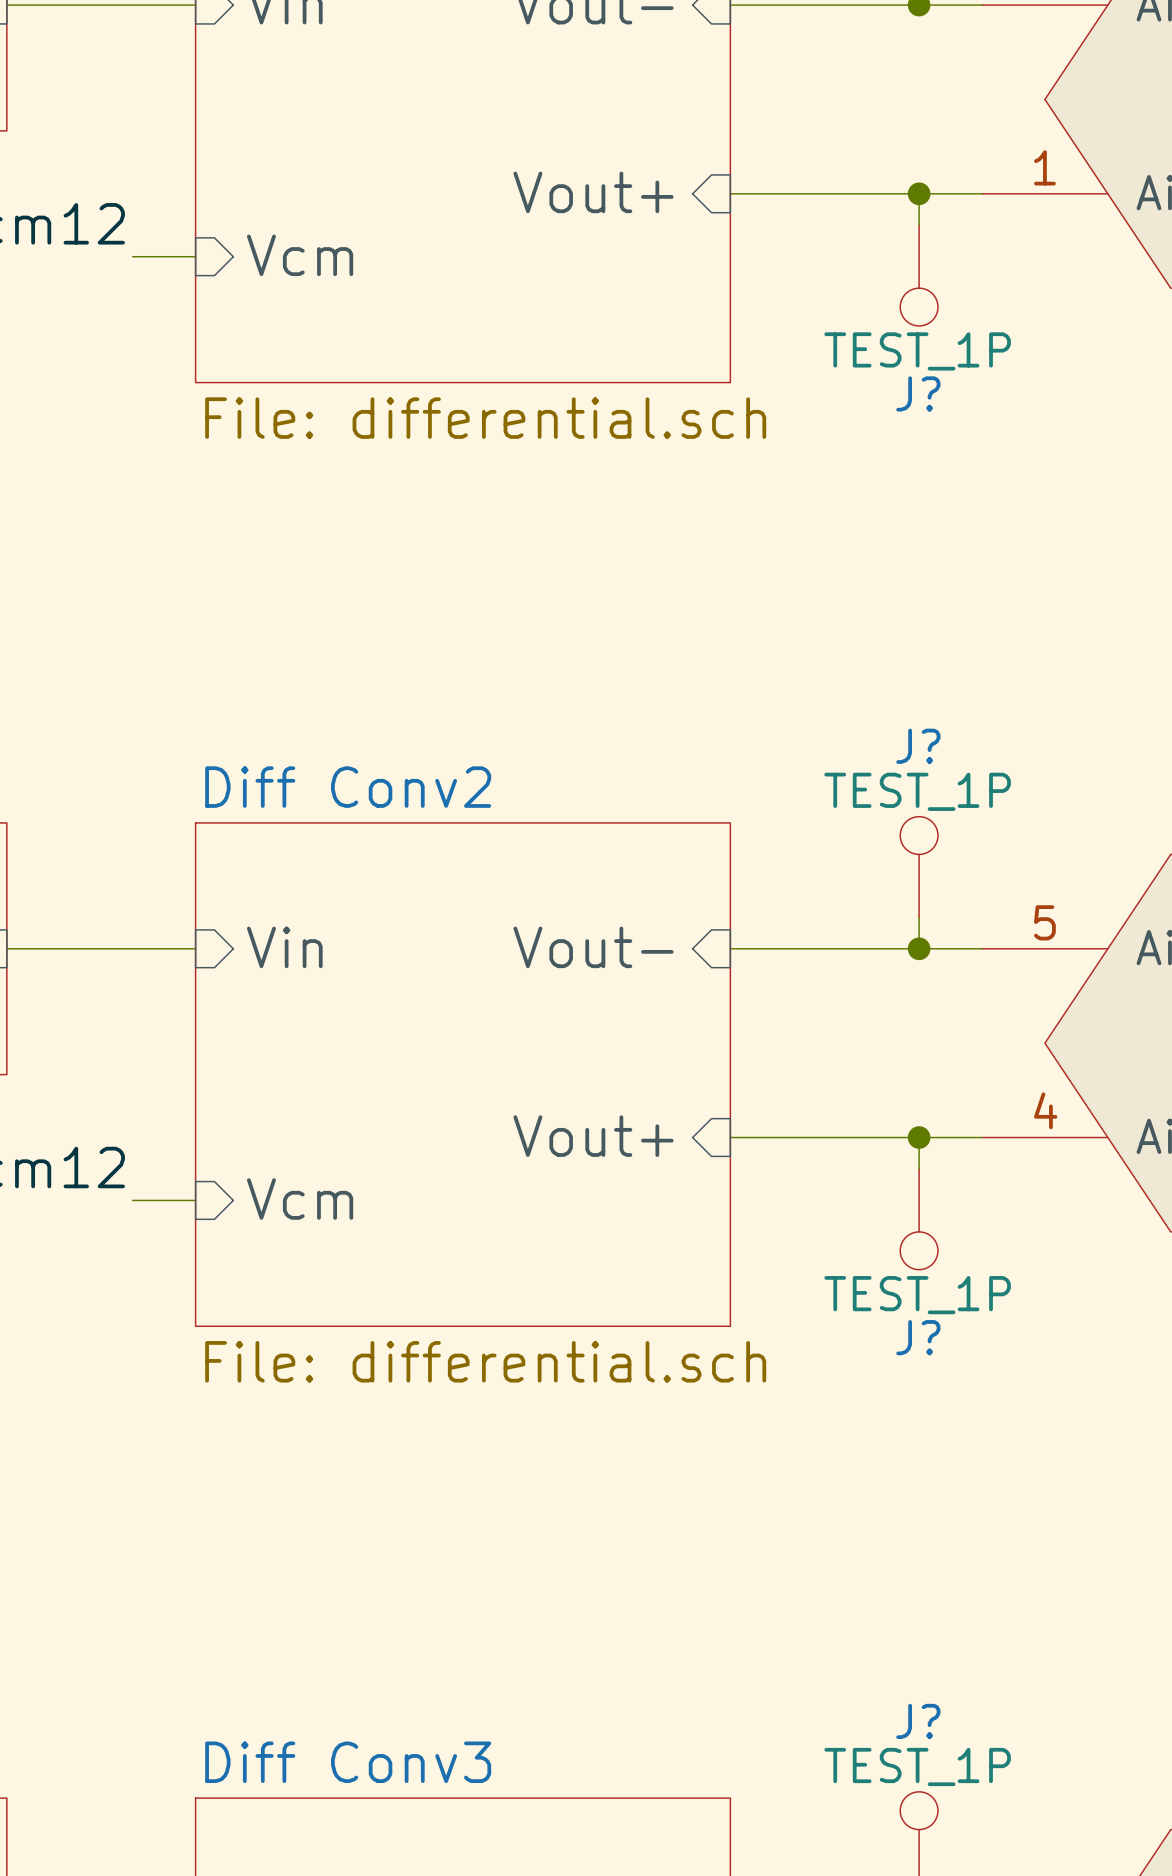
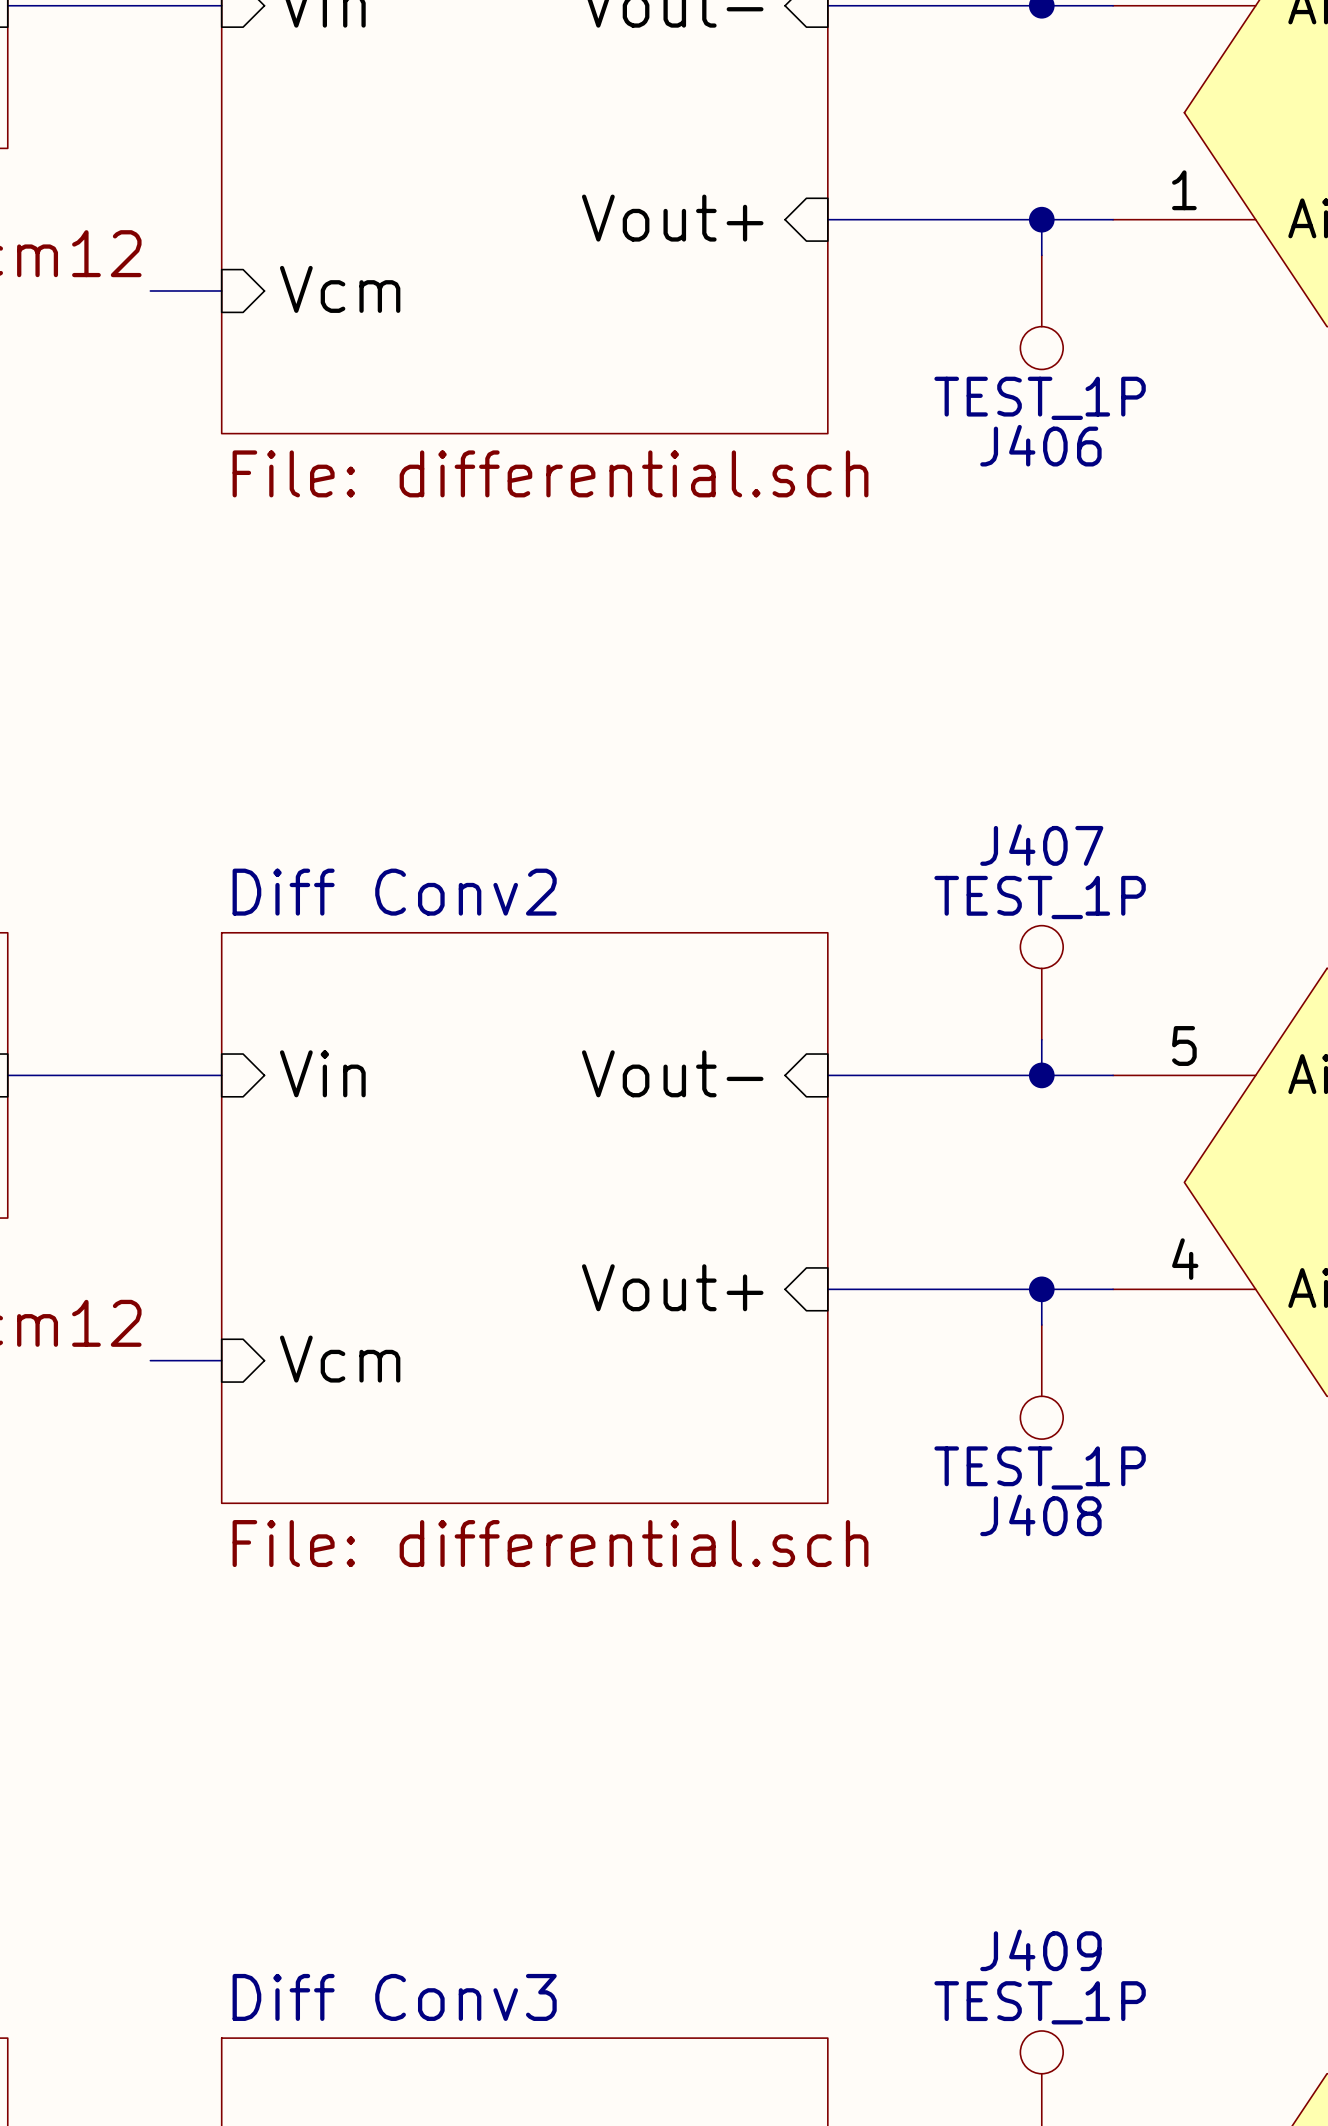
J? name: J? (918, 393) -> J406 (1040, 445)
J? name: J? (918, 746) -> J407 (1041, 845)
J? name: J? (918, 1337) -> J408 (1040, 1515)
J? name: J? (918, 1721) -> J409 (1040, 1950)

